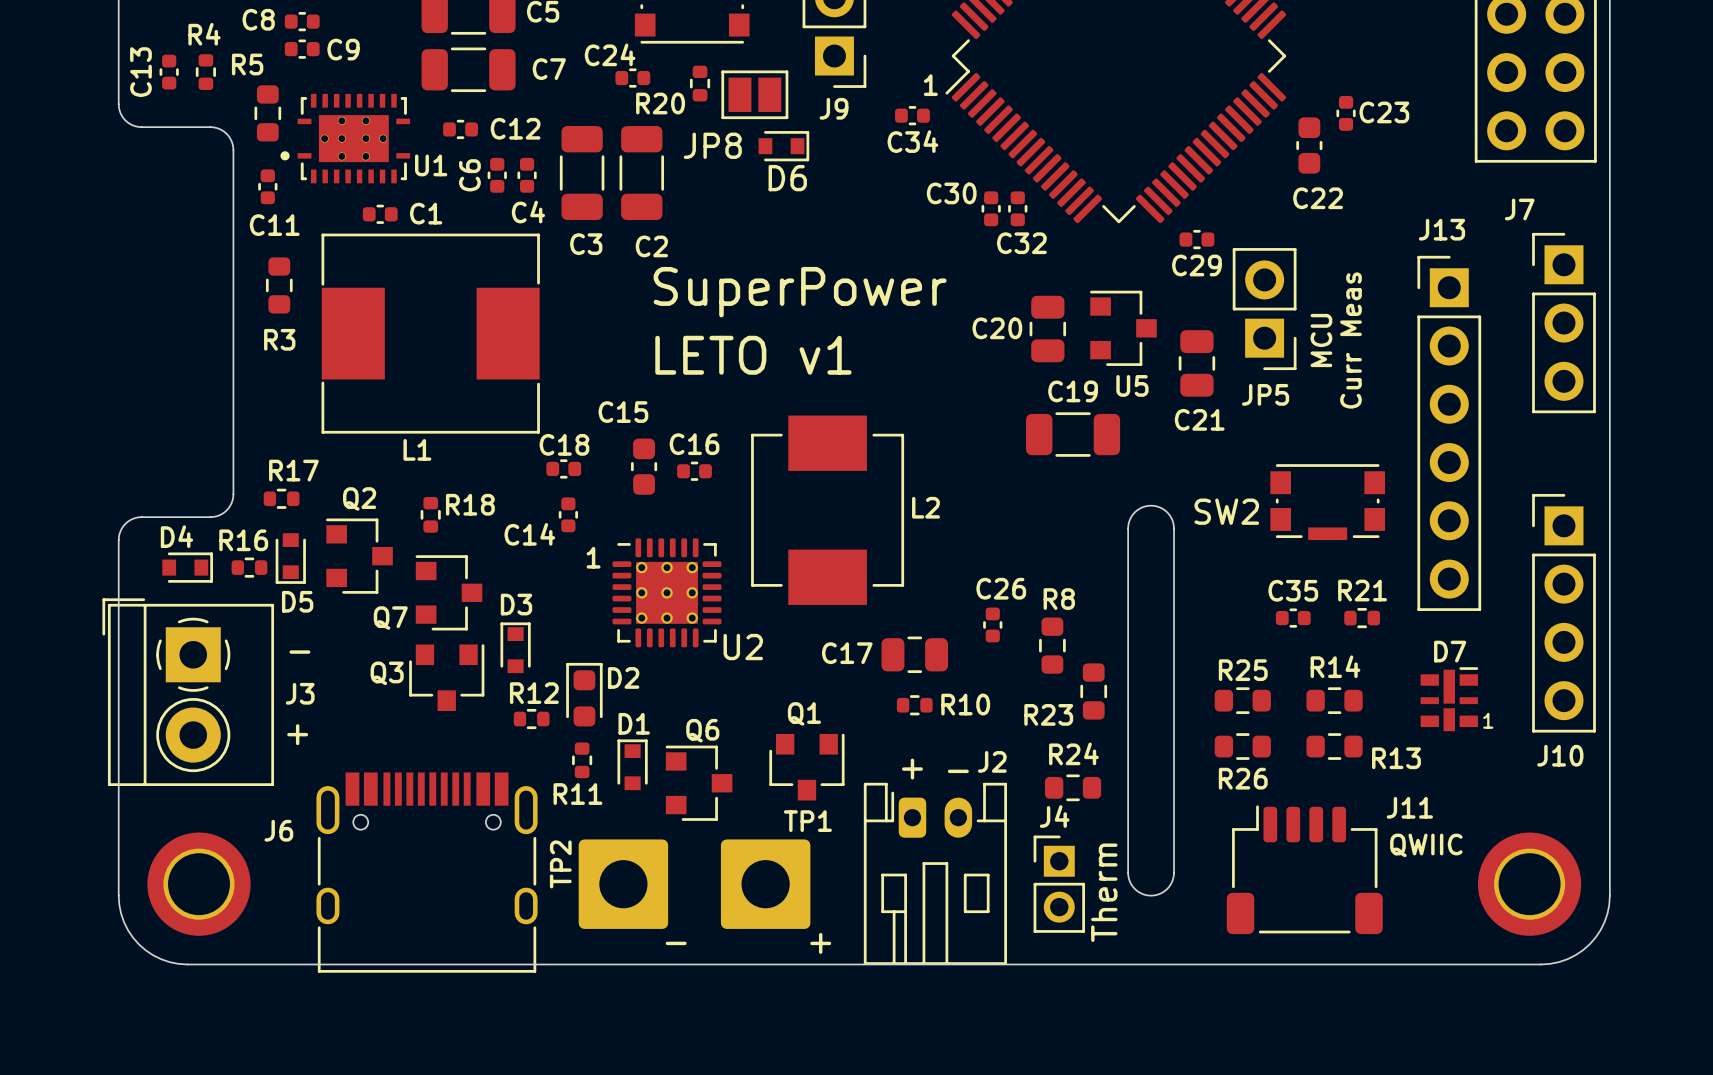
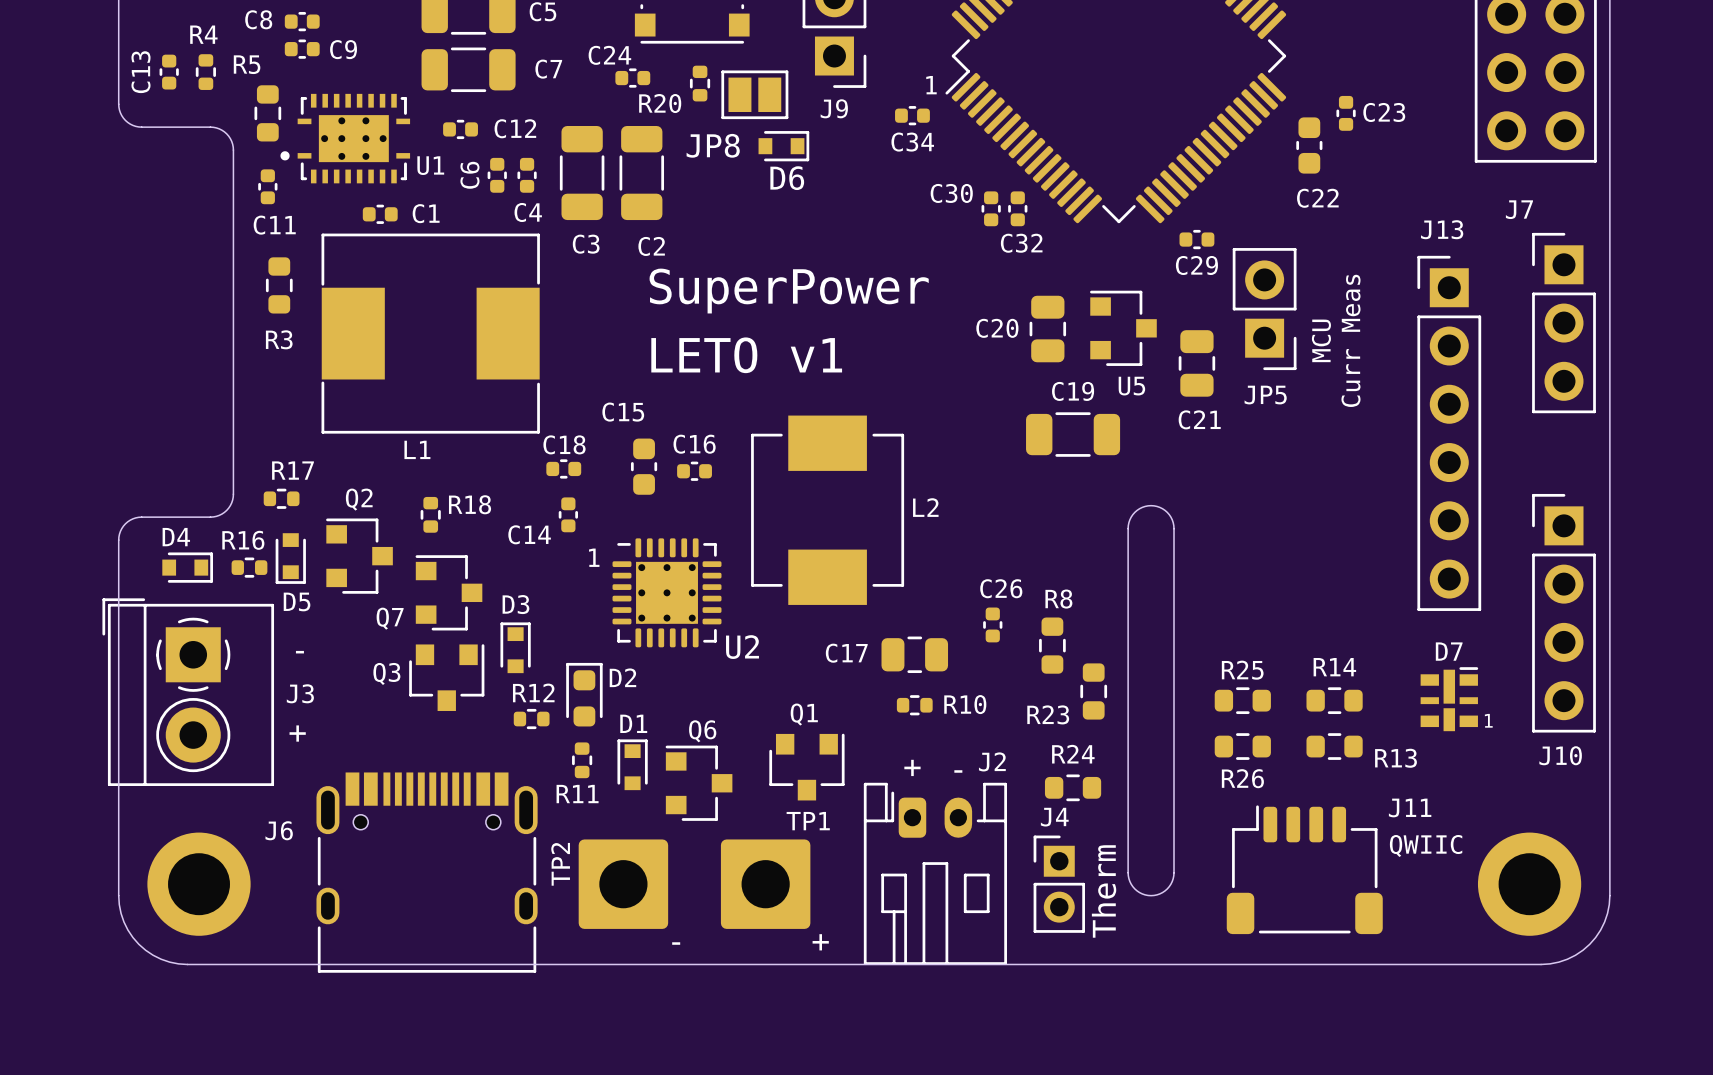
SW2: (1327, 502) -> none
C35: (1293, 618) -> none
R21: (1362, 618) -> none

